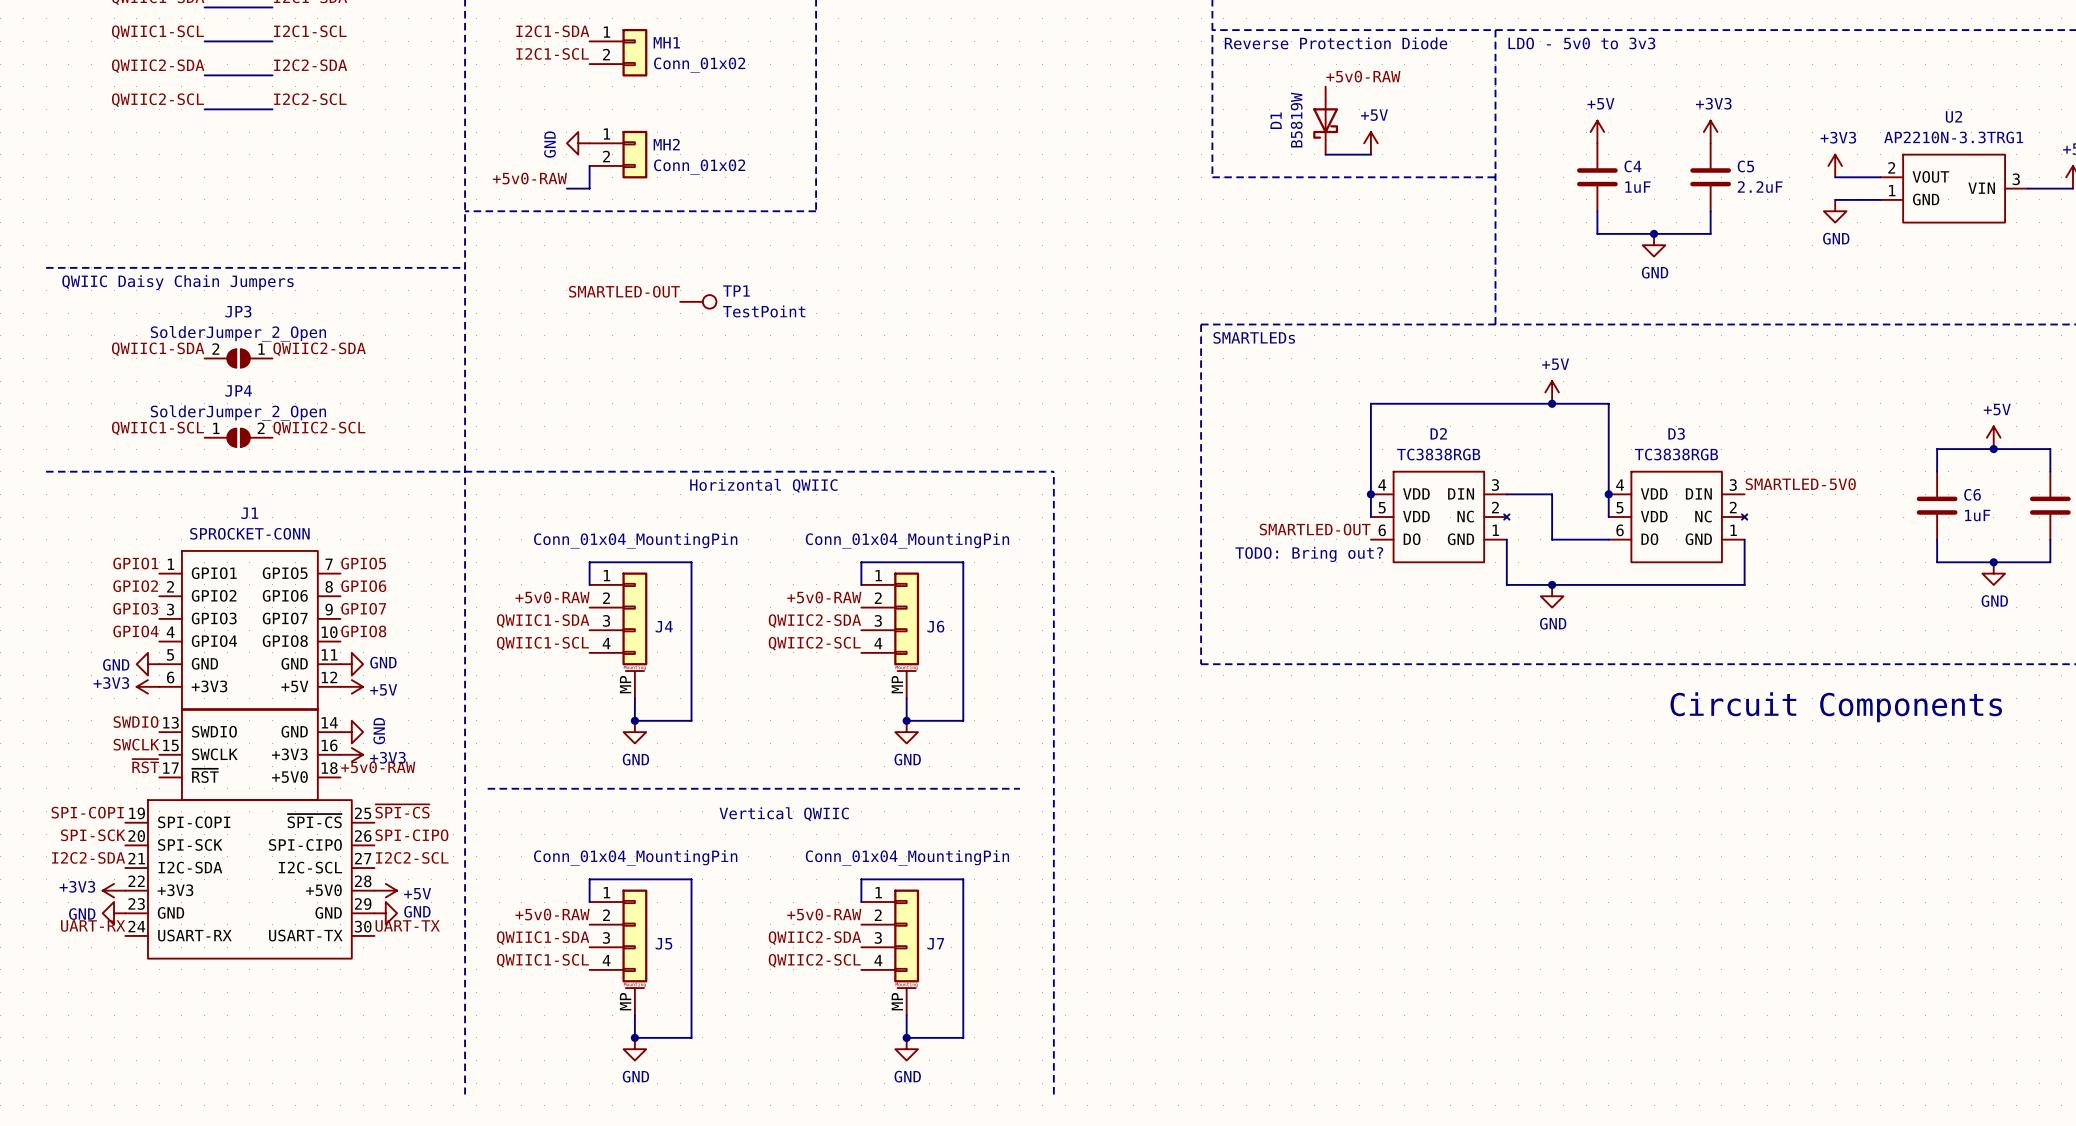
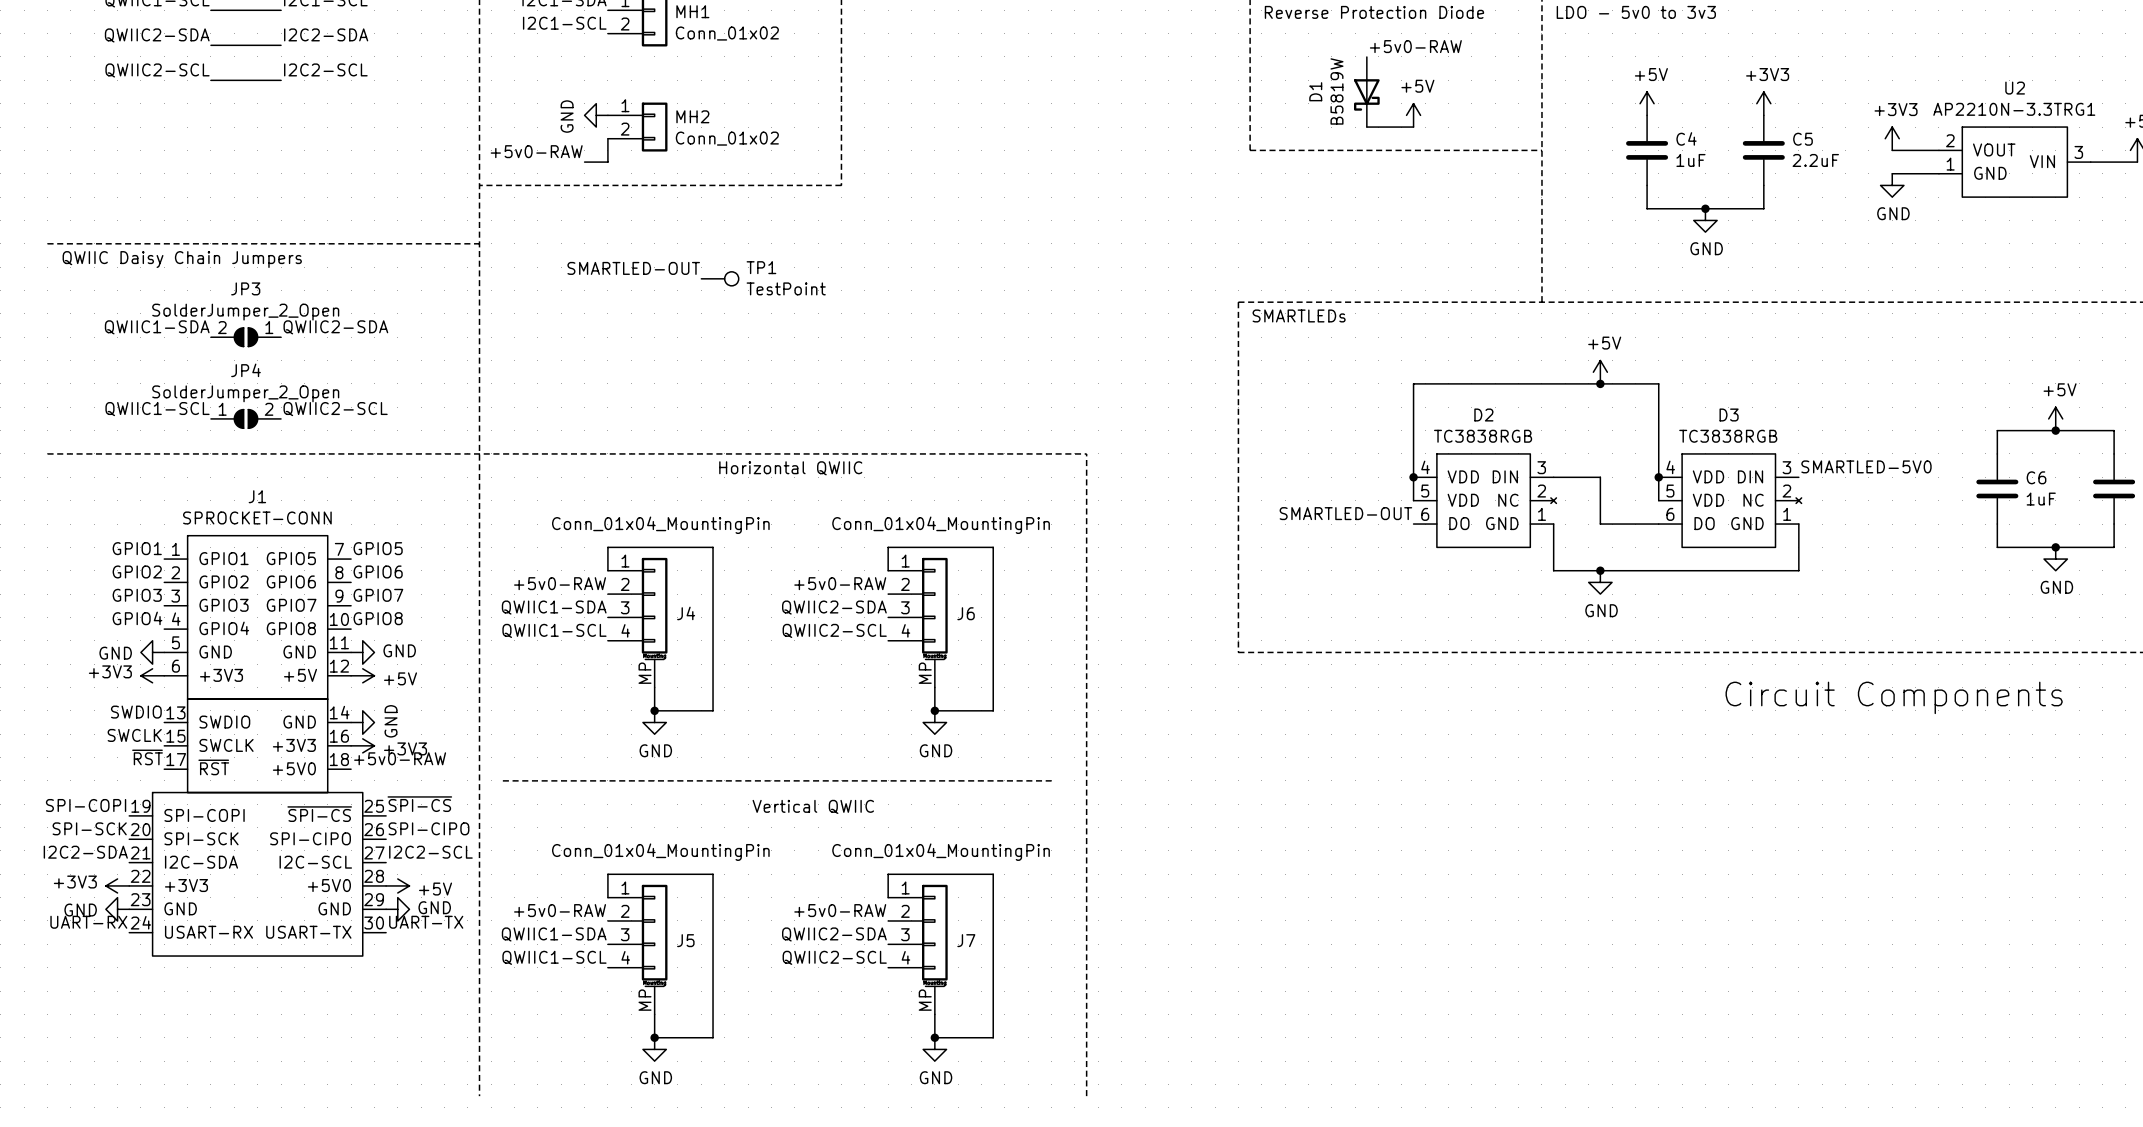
text: TODO: Bring out? (1309, 554) -> none

